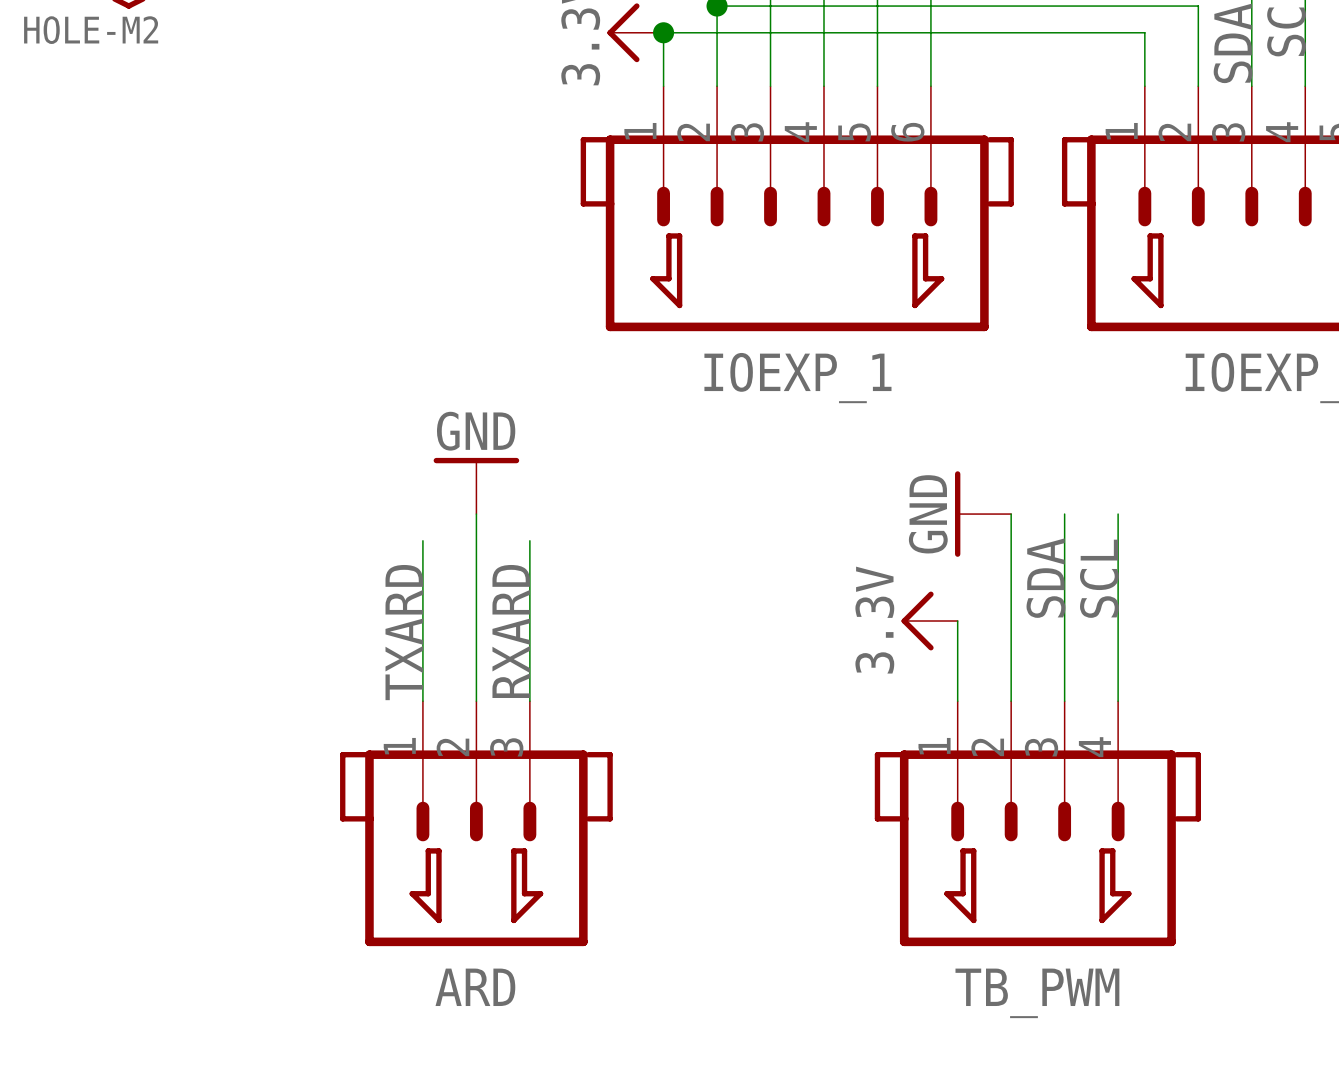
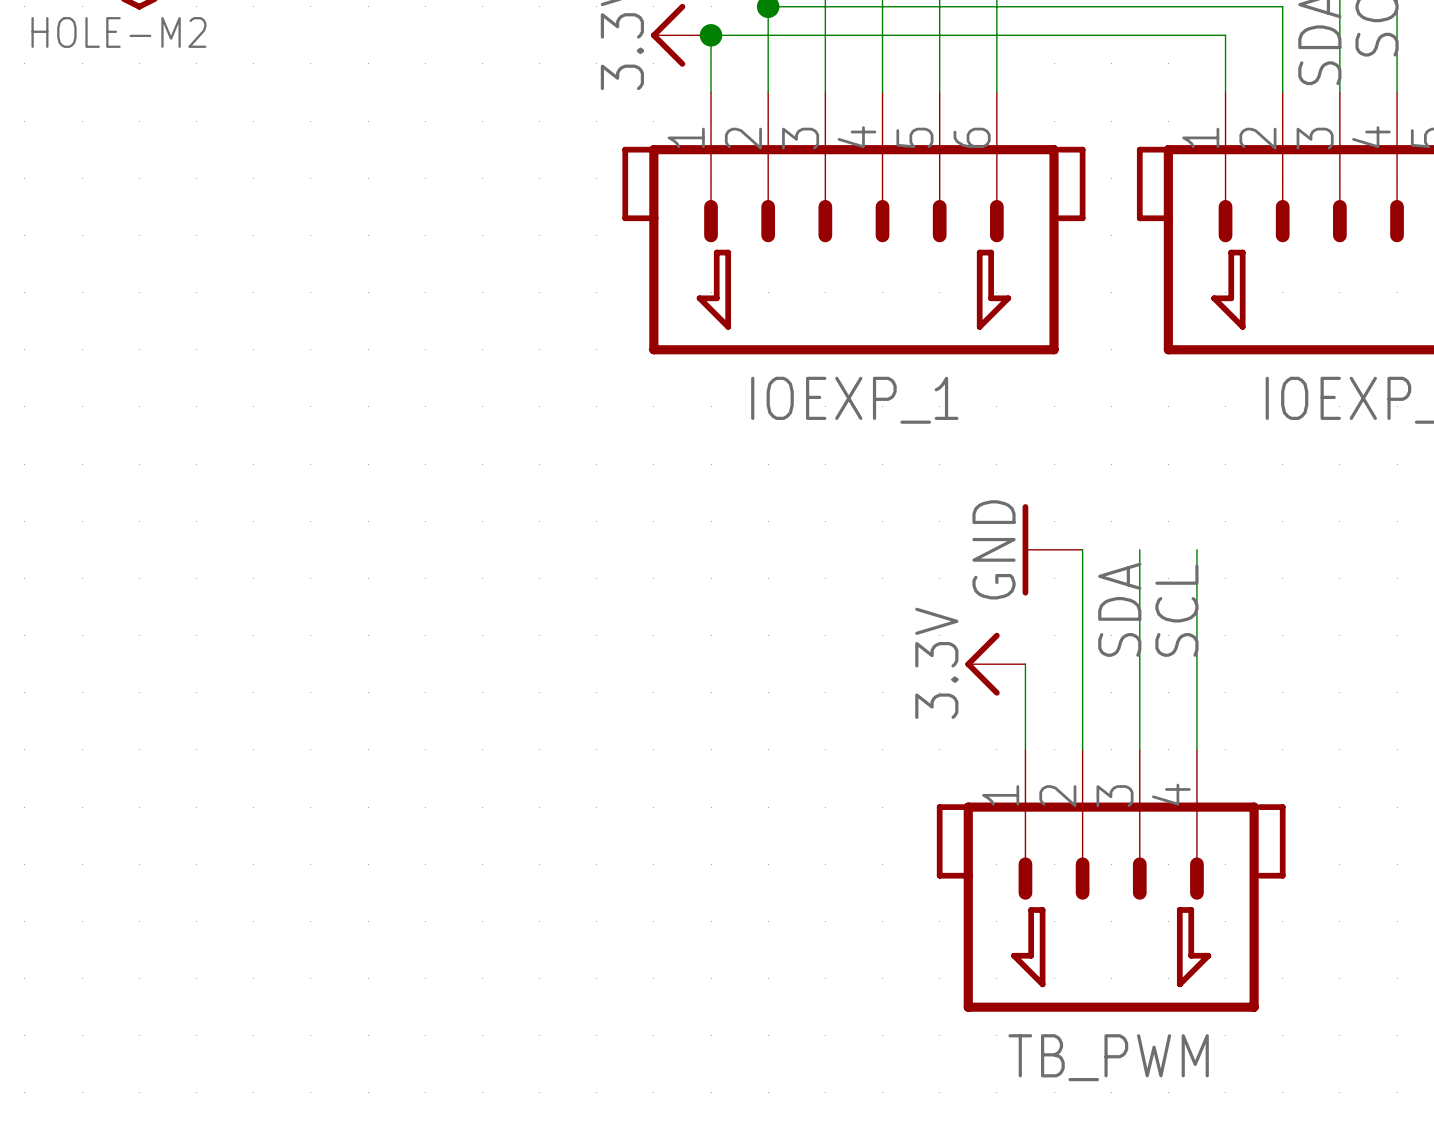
power symbol: (476, 485) -> none
wire: (476, 514) (476, 701) -> none
wire: (422, 540) (422, 701) -> none
wire: (529, 540) (529, 701) -> none
label: RXARD (511, 631) -> none
label: TXARD (404, 632) -> none
ARD: (476, 823) -> none

